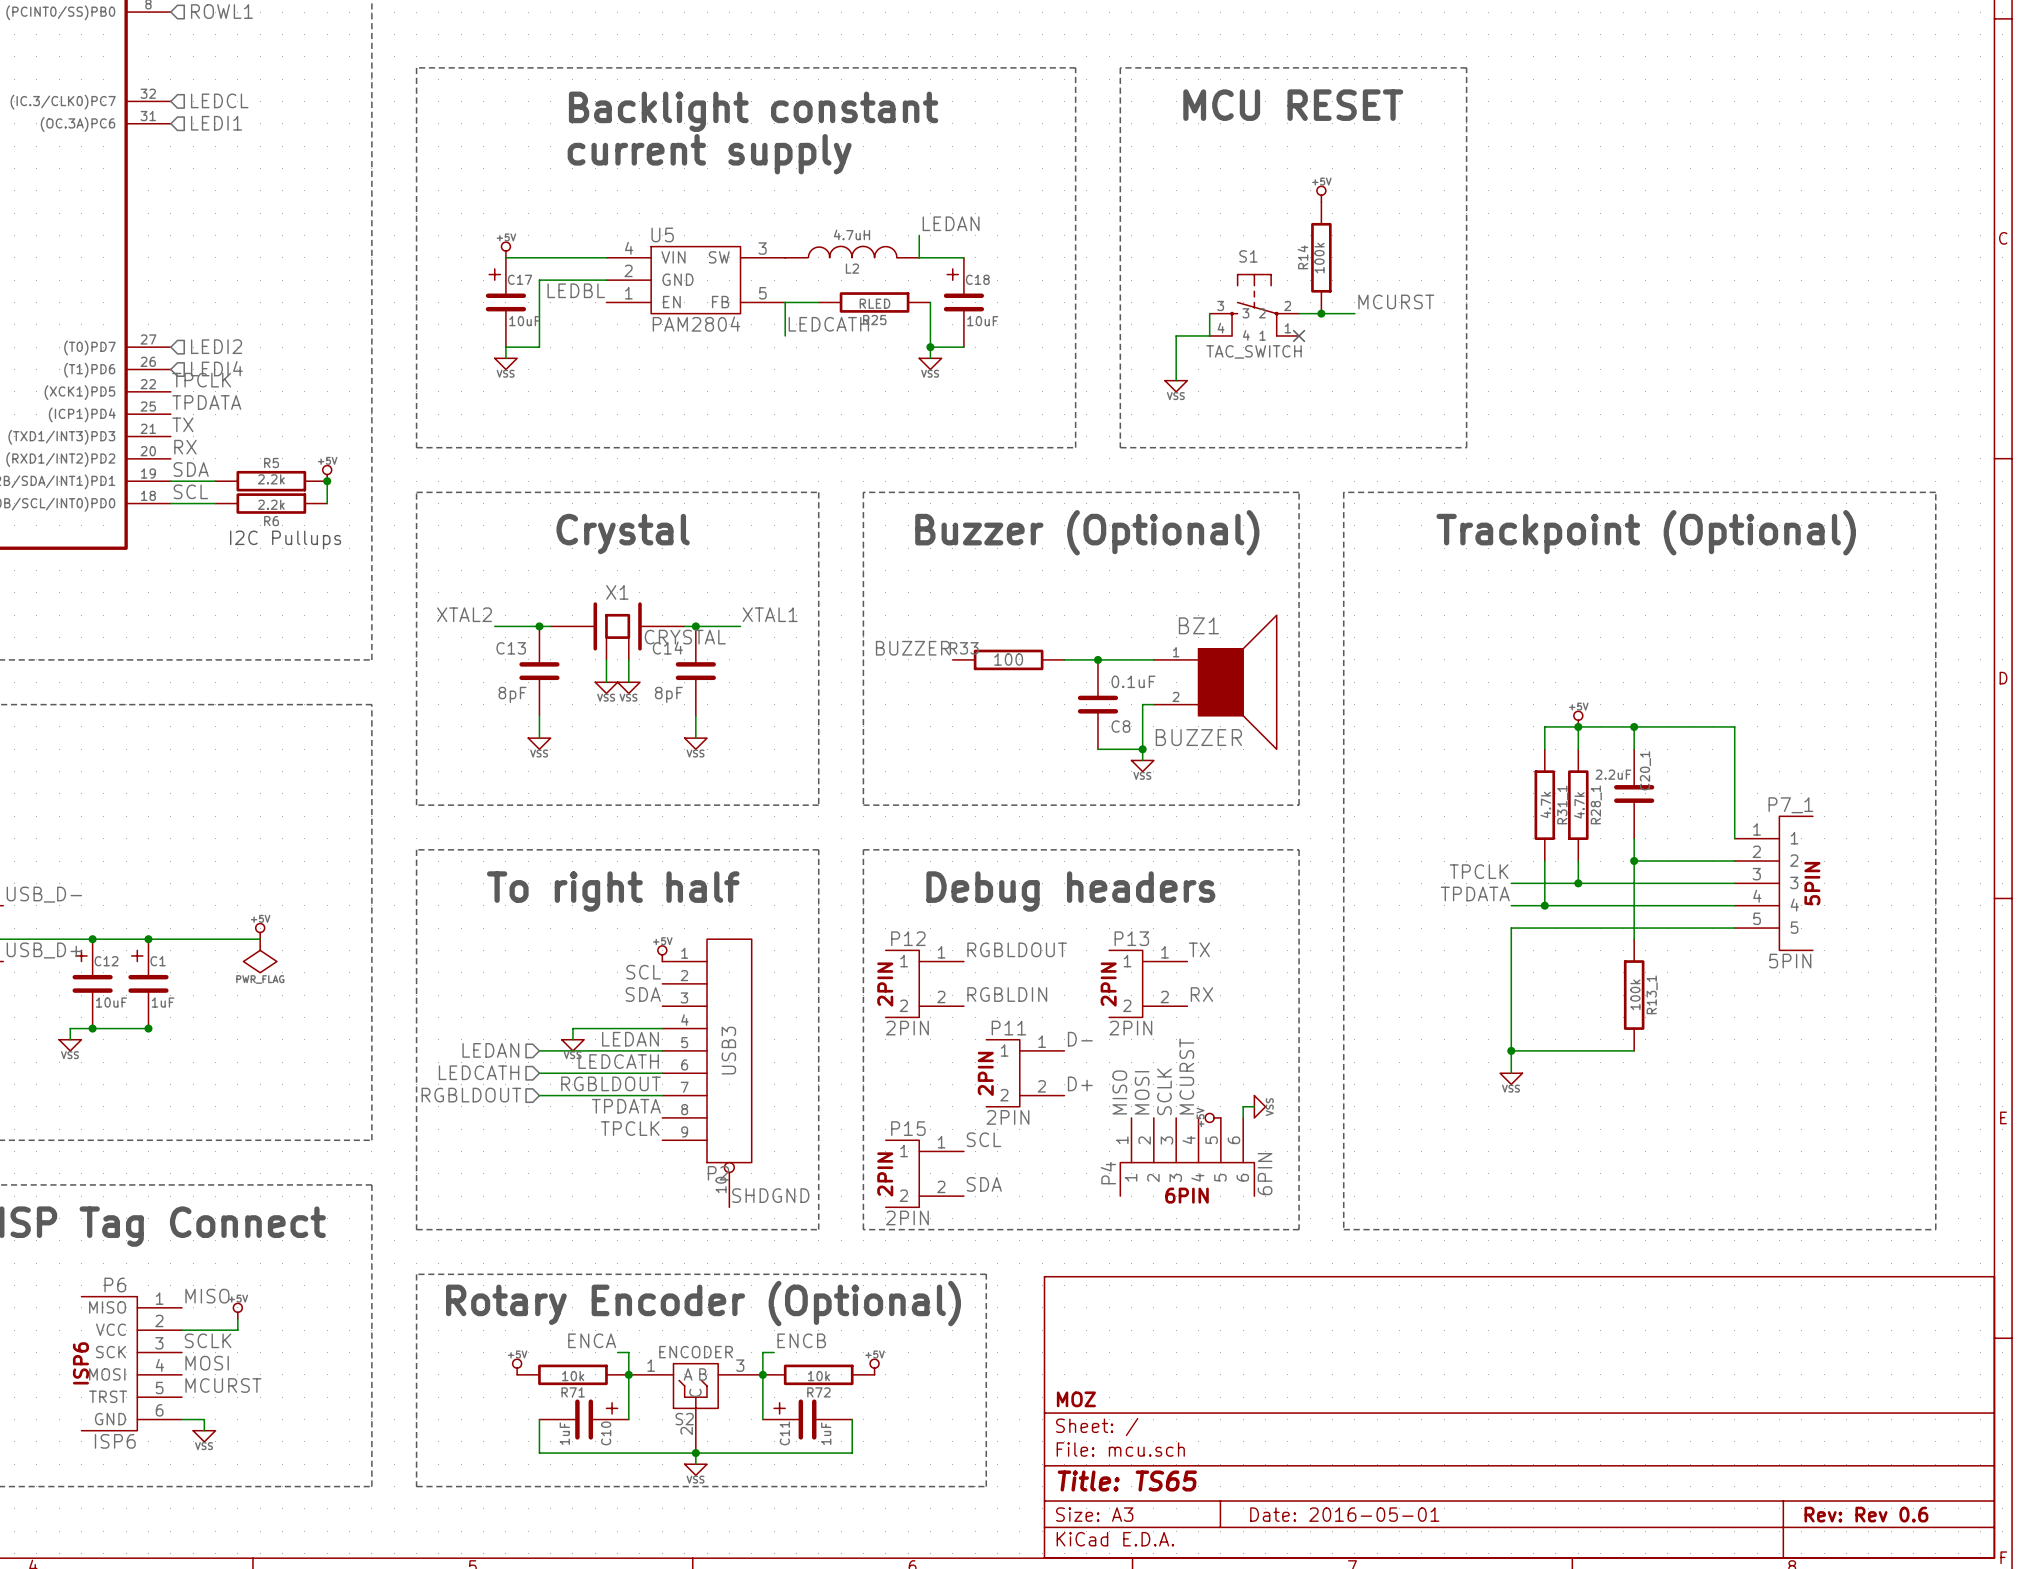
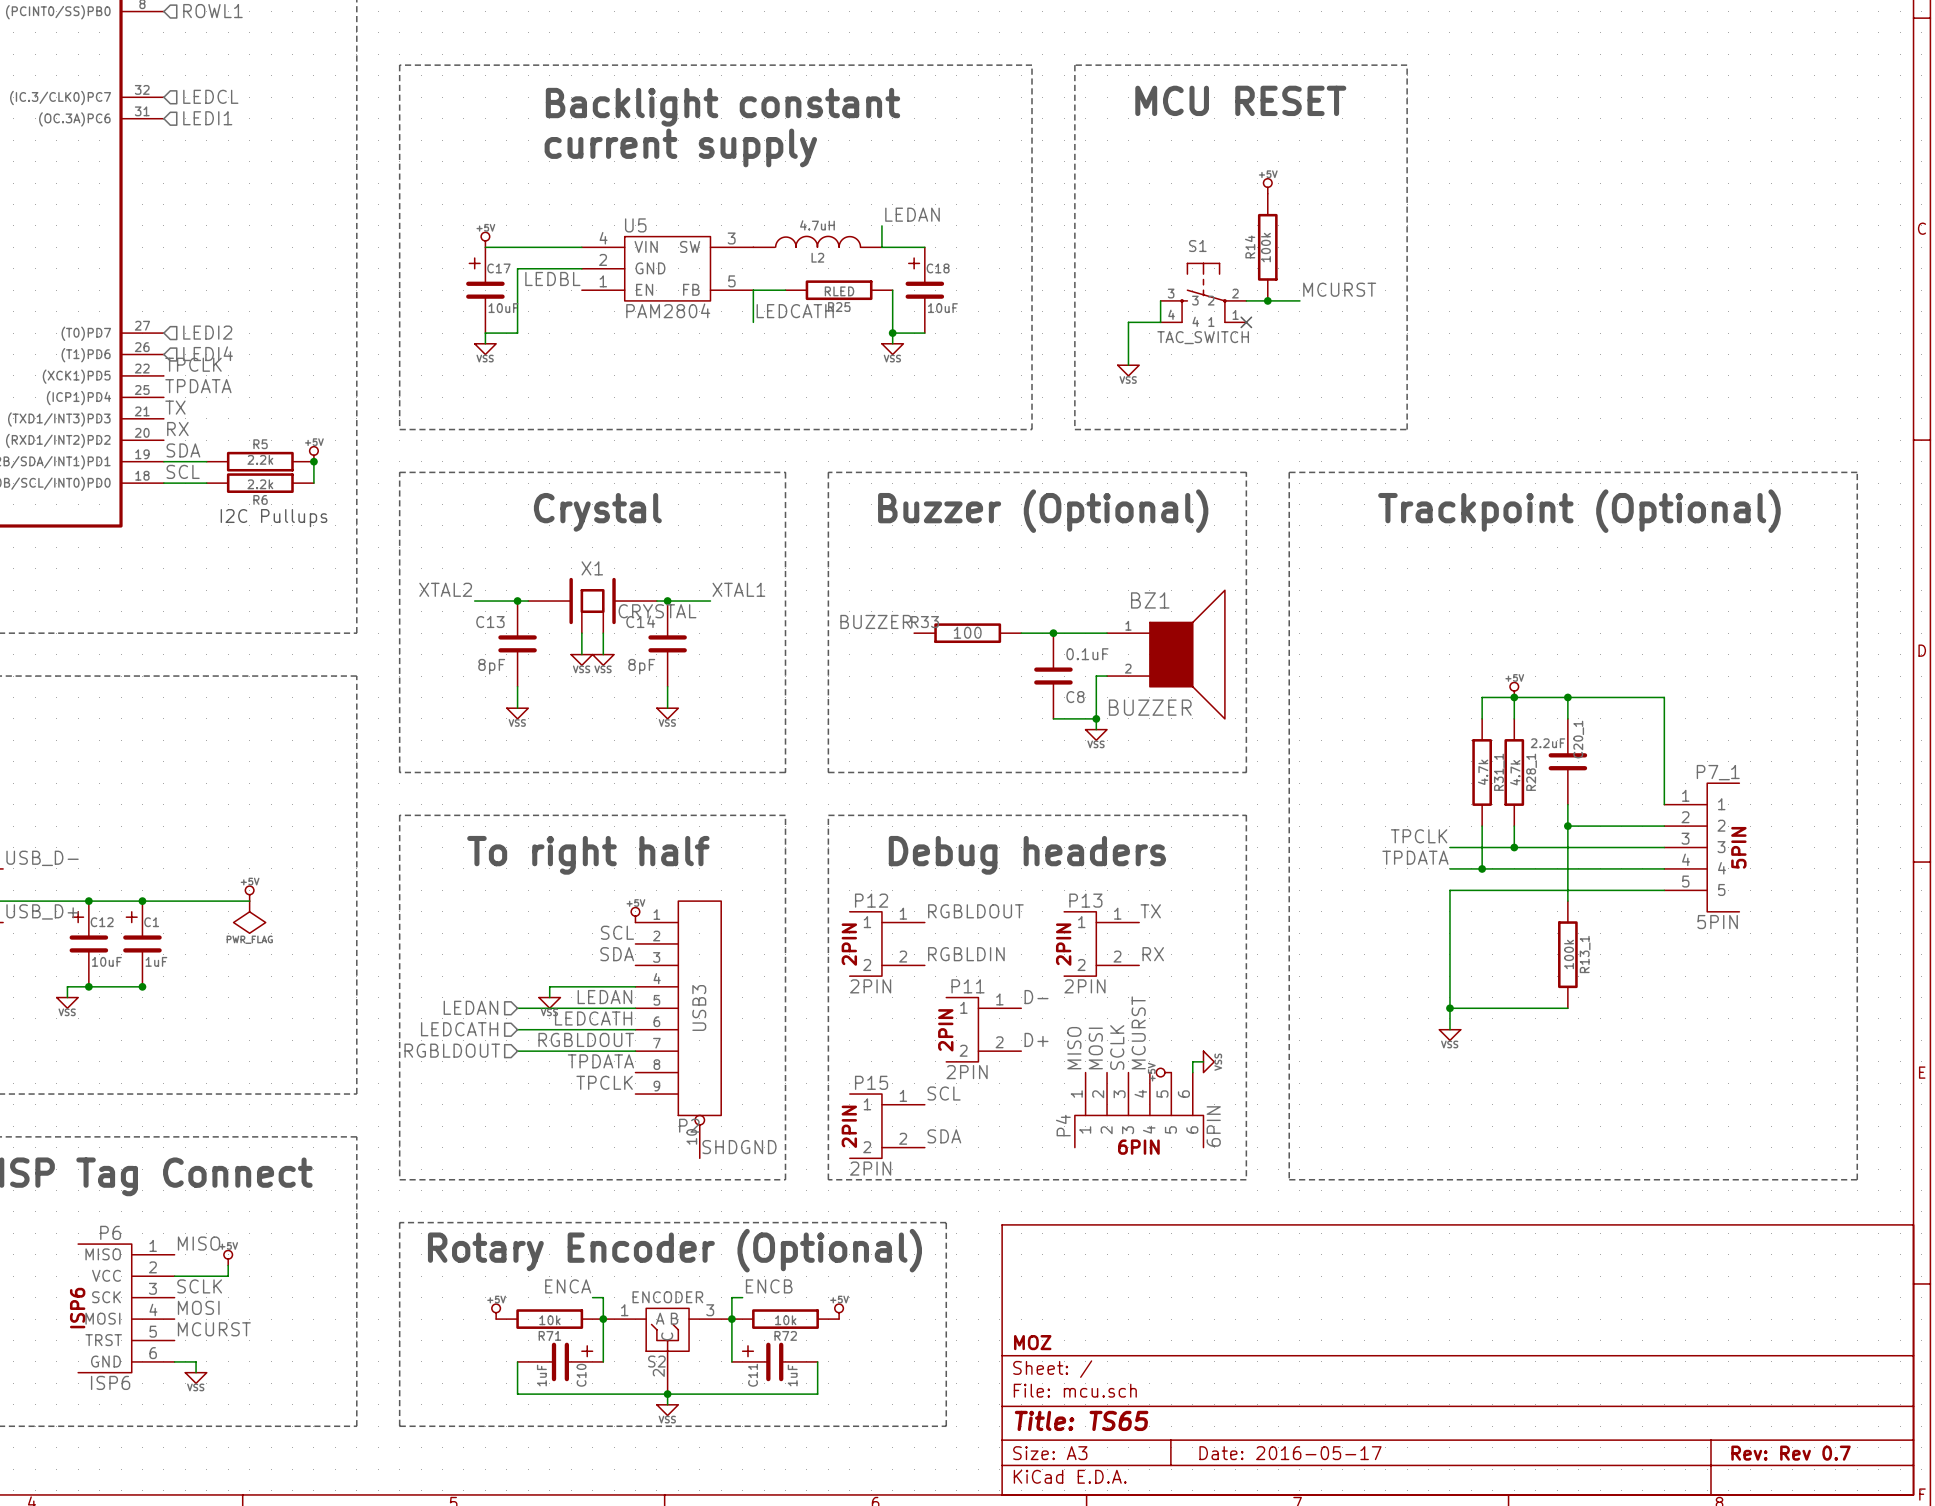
title block: Date: 2016-05-01 (1344, 1514) -> Date: 2016-05-17 (1290, 1453)
title block: Rev: Rev 0.6 (1866, 1514) -> Rev: Rev 0.7 (1791, 1453)

